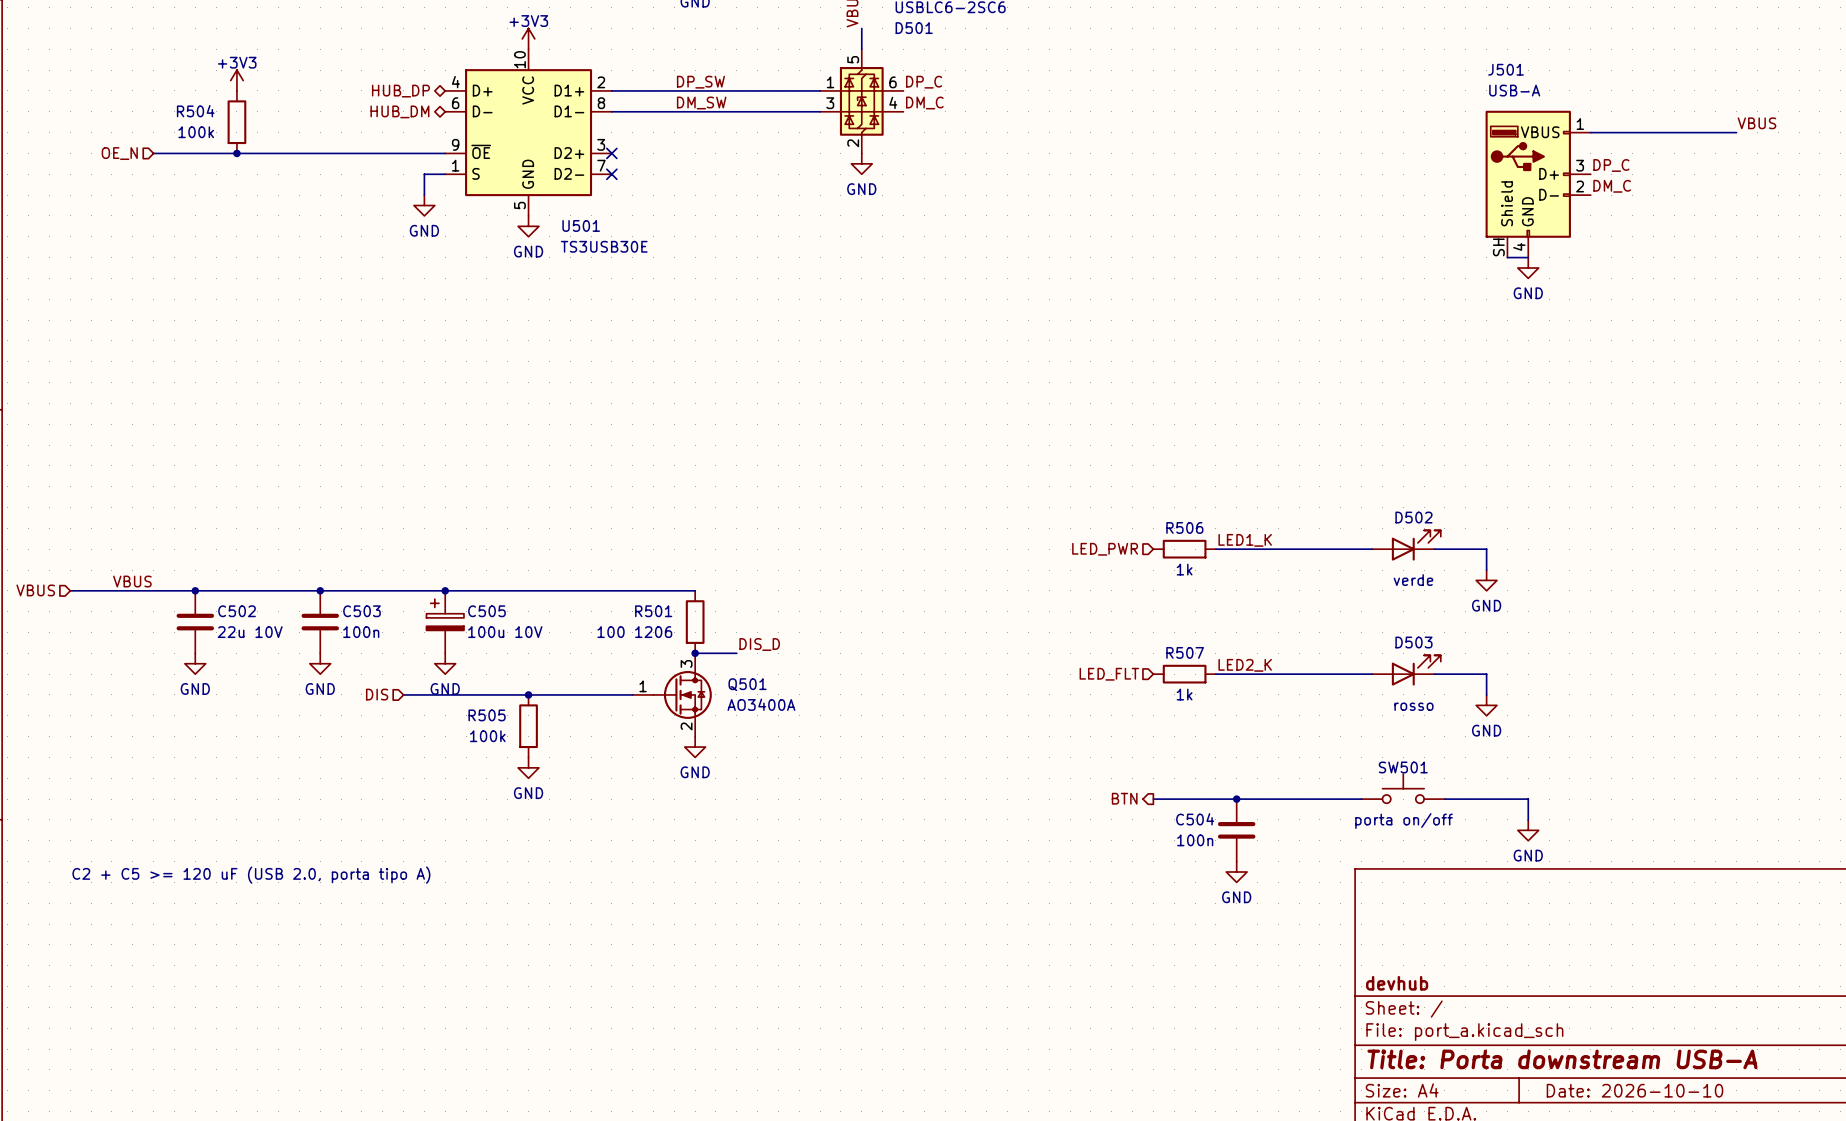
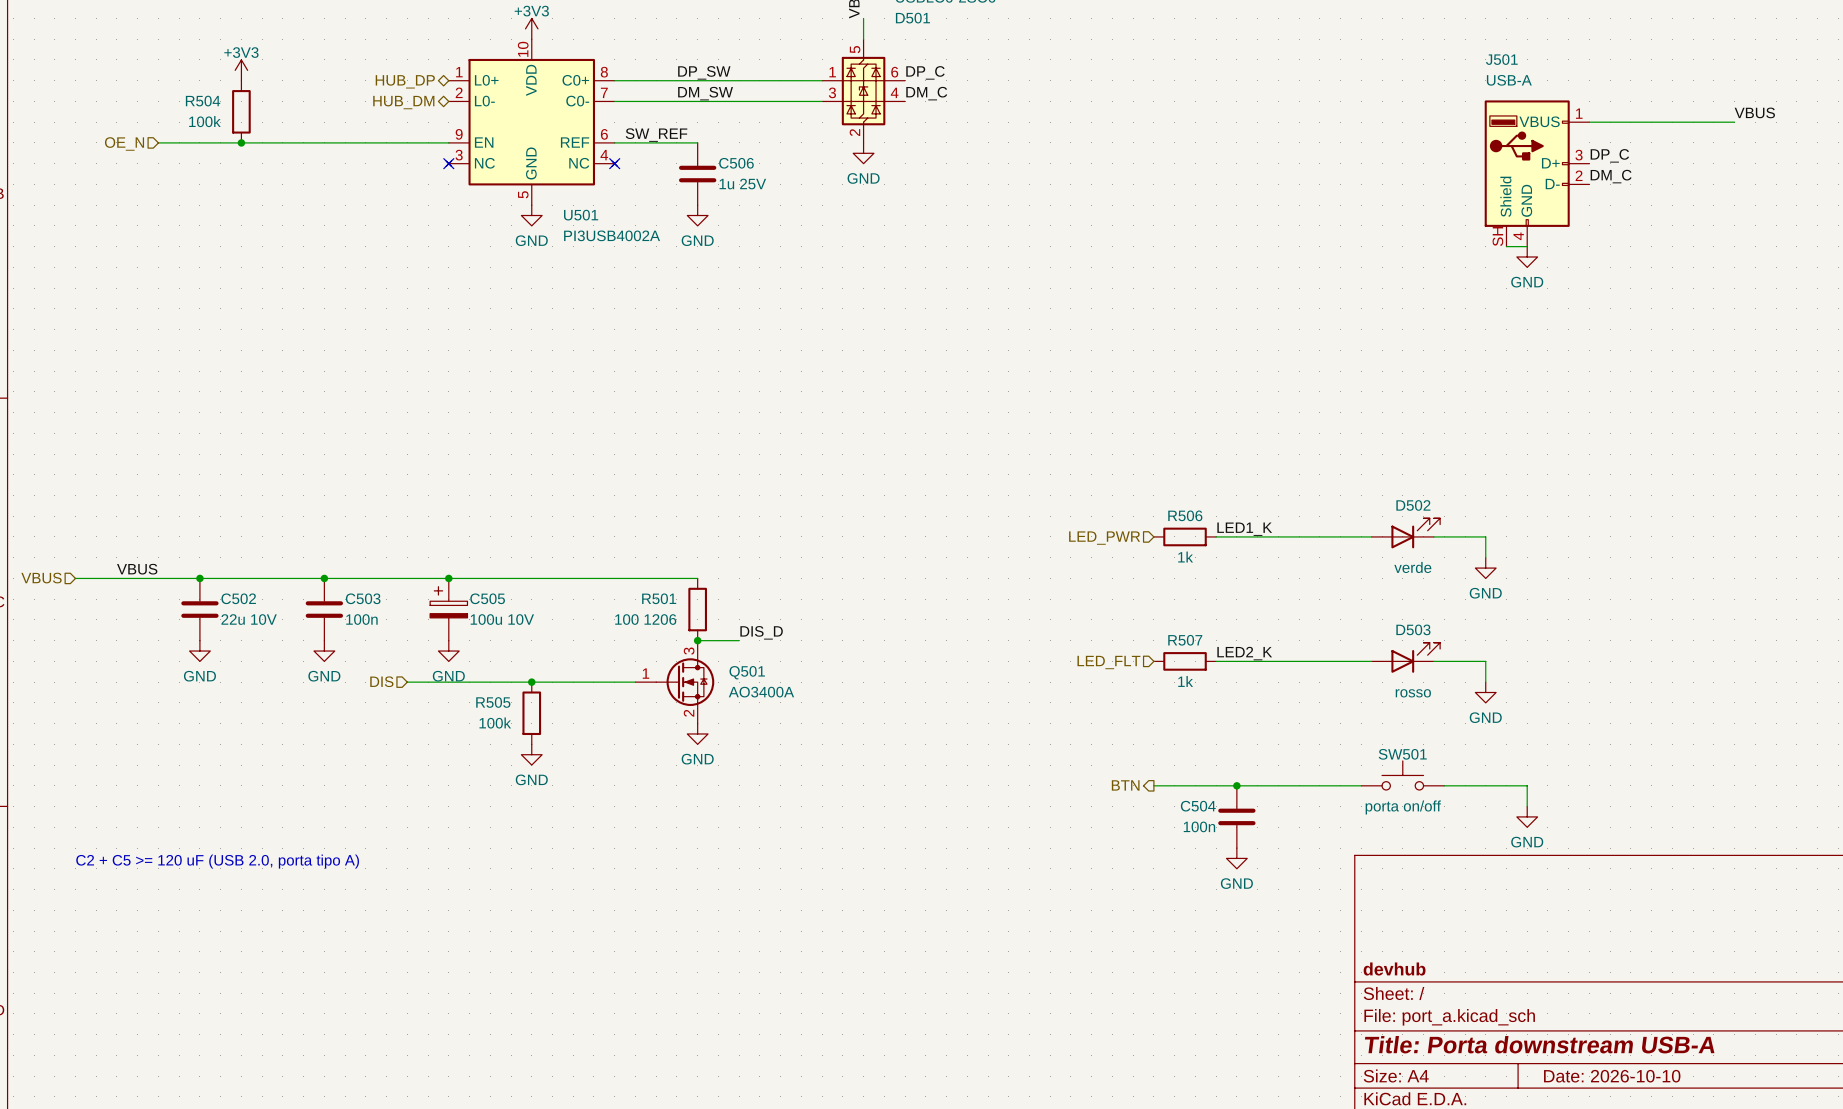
U501 symbol: [445, 49, 612, 216] -> [446, 39, 618, 206]
label: none -> SW_REF (656, 135)
wire: none -> (614, 142) (697, 142)
no-connect mark: (611, 153) -> none
wire: (445, 174) (424, 174) (424, 195) -> none
no-connect mark: none -> (448, 163)
C506: none -> 1u 25V (697, 174)
power symbol: GND (424, 205) -> none
power symbol: none -> GND (697, 215)
U501 value: TS3USB30E (604, 246) -> PI3USB4002A (612, 235)

